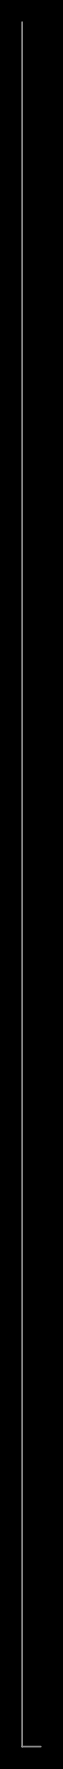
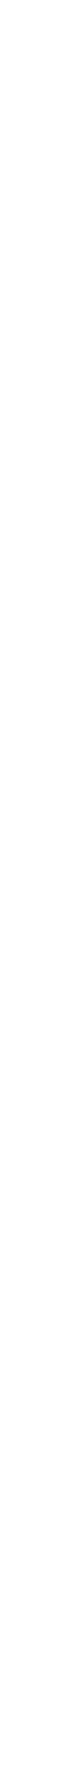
bus: (22, 22) (22, 1746) (40, 1746) -> none

